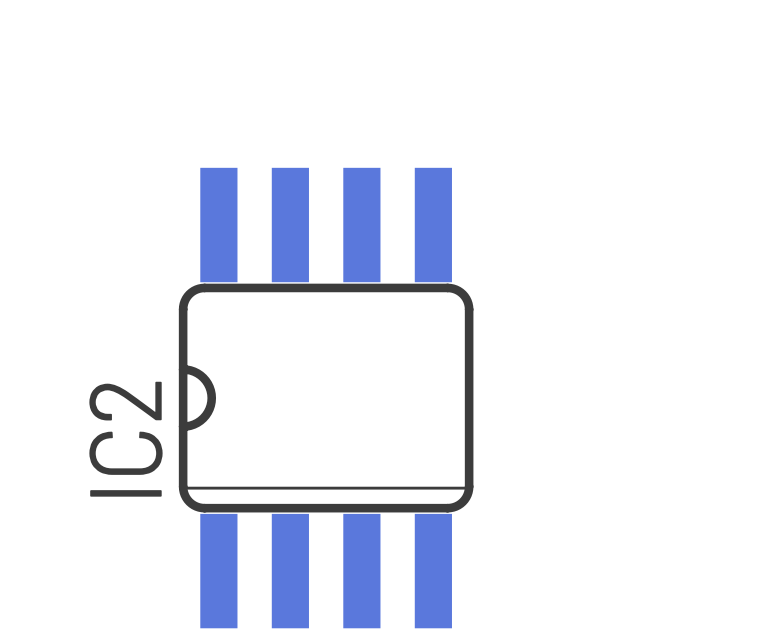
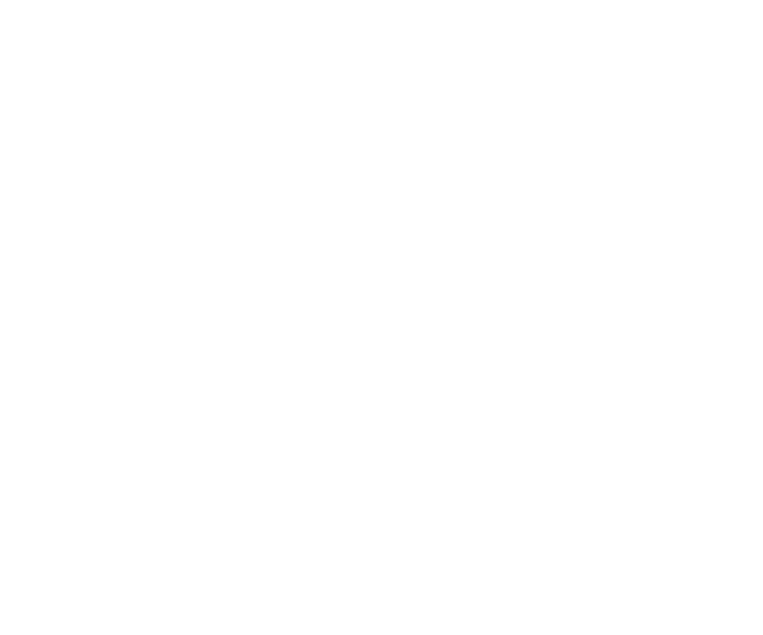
IC2: (326, 398) -> none

